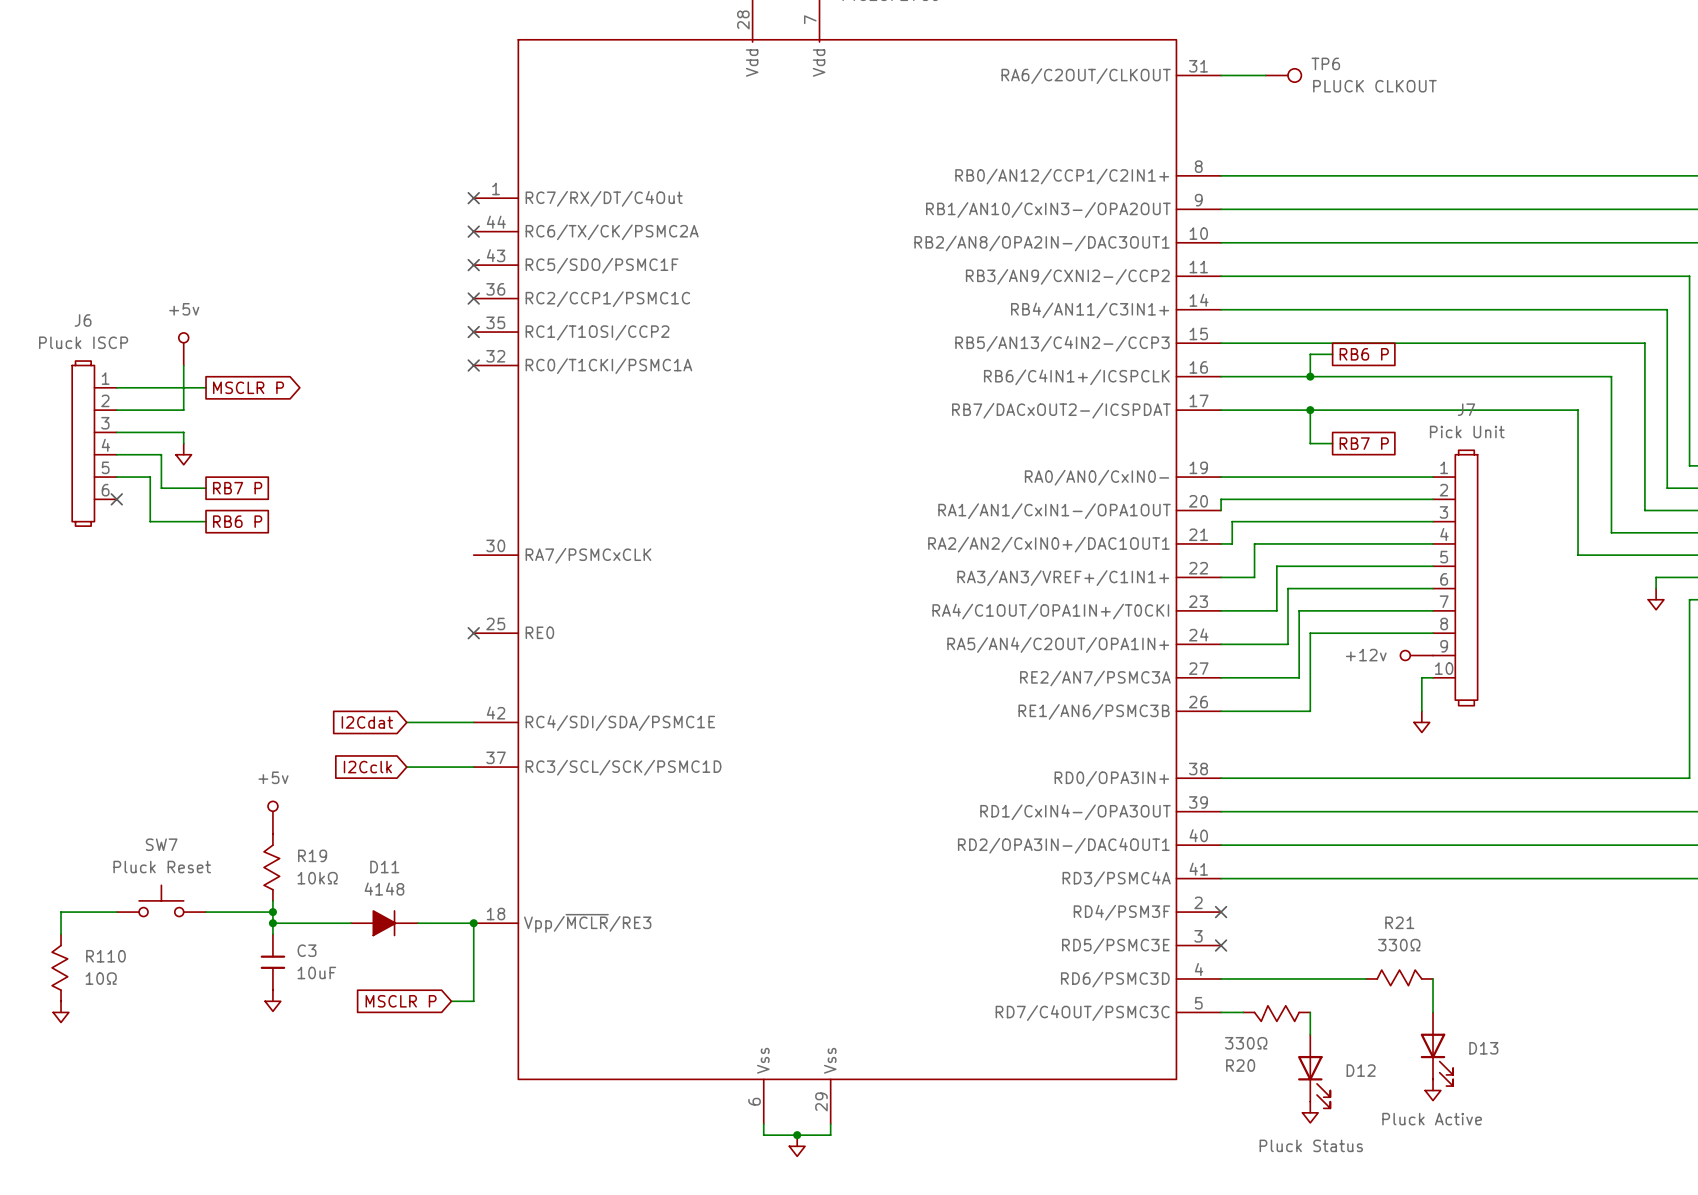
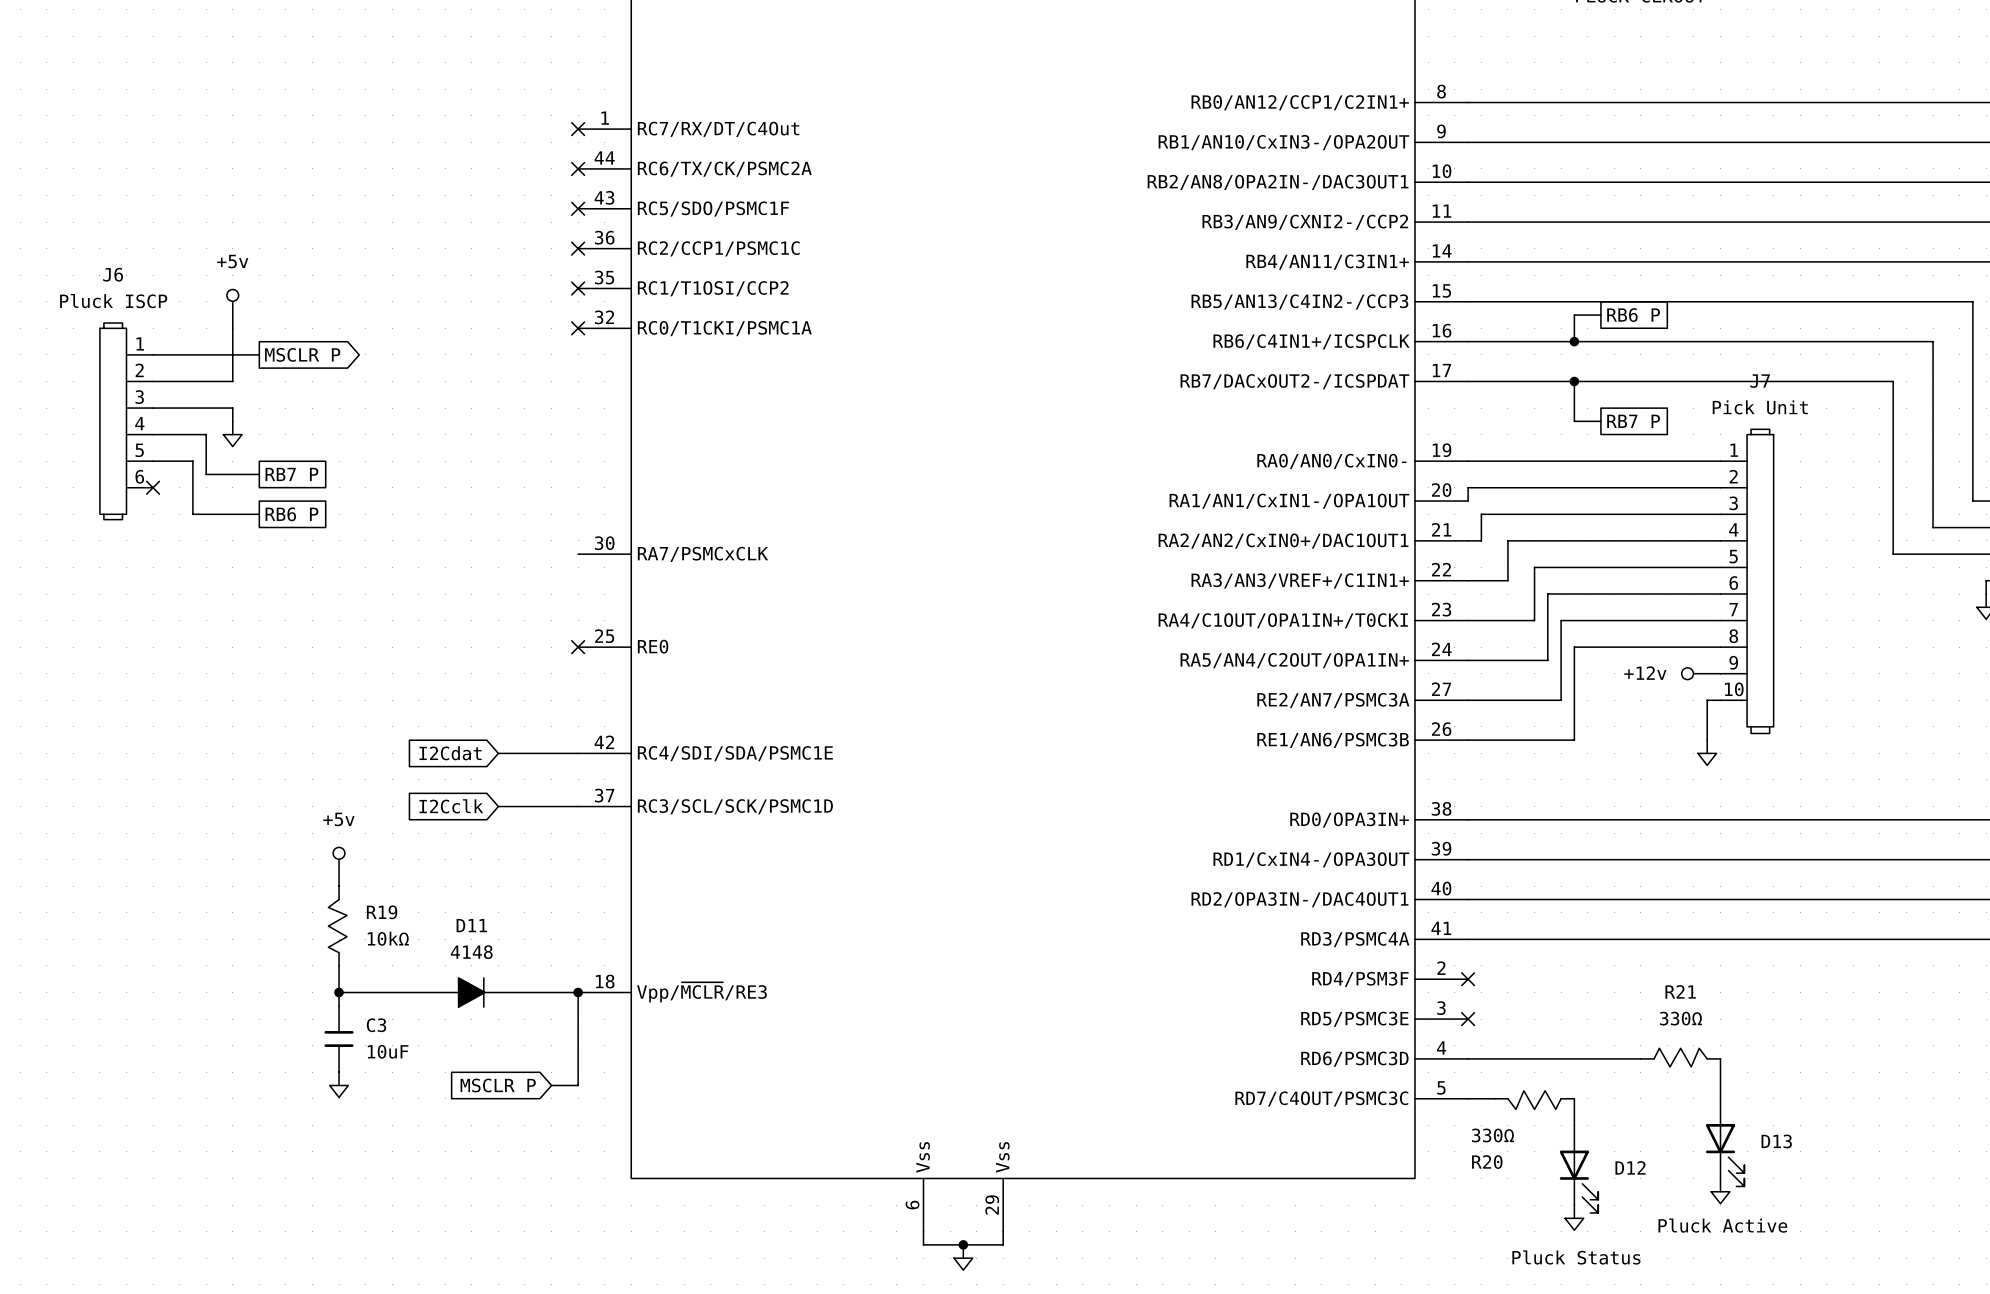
SW7: Pluck Reset (161, 900) -> none
wire: (116, 912) (61, 912) (61, 934) -> none
wire: (206, 912) (272, 912) -> none
junction: (272, 912) -> none
R110: 10Ω (59, 967) -> none
power symbol: (61, 1011) -> none

